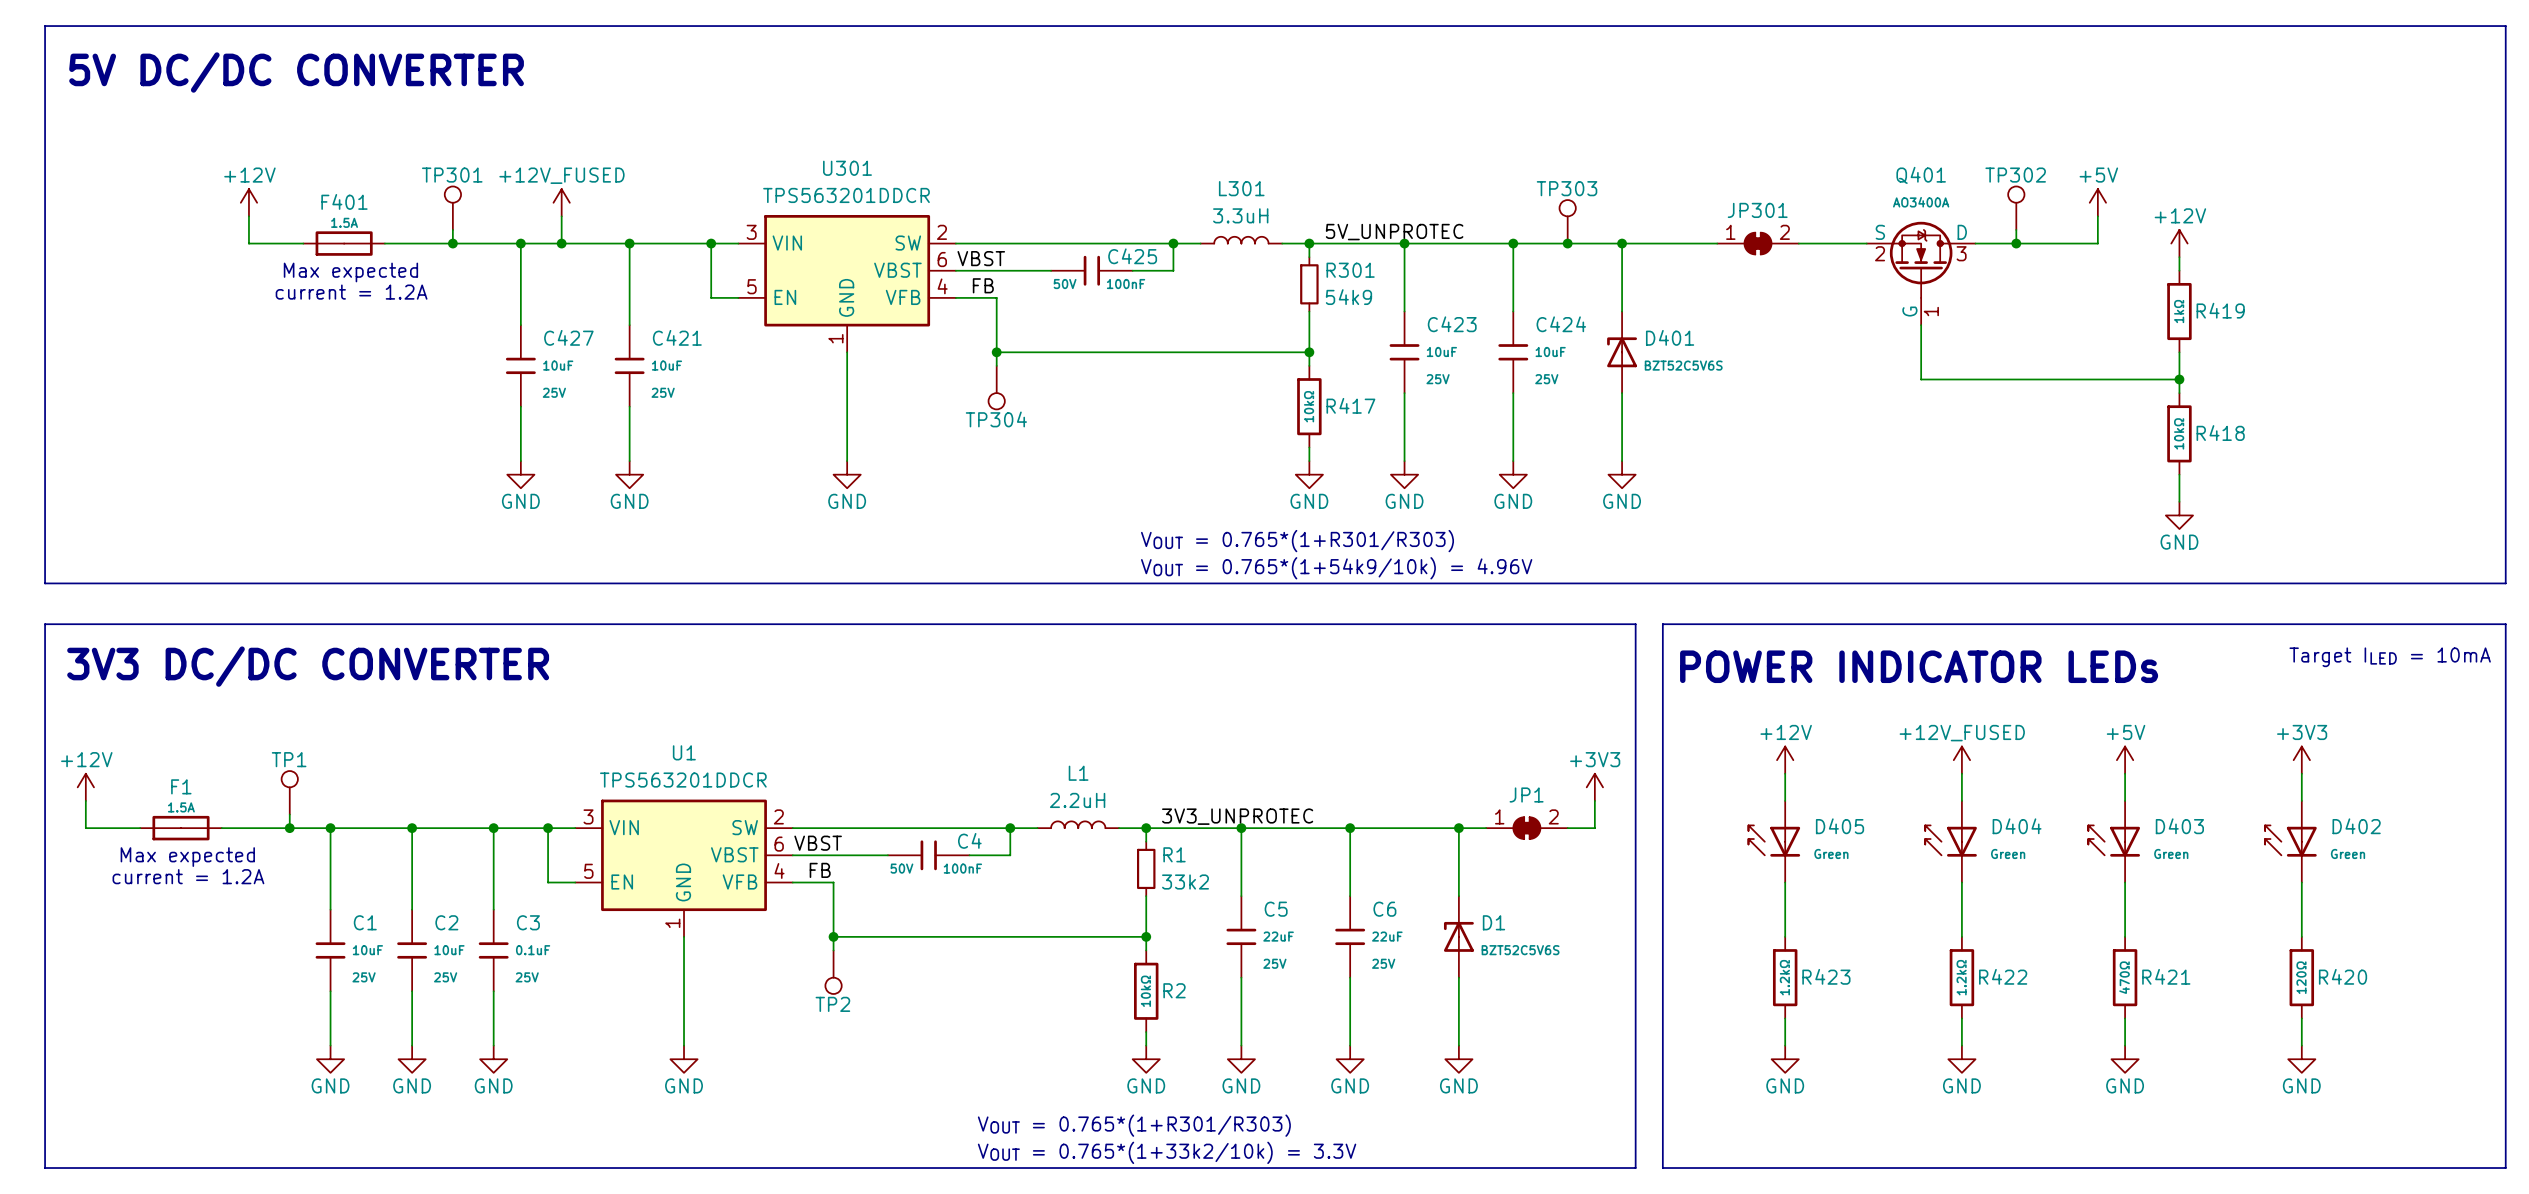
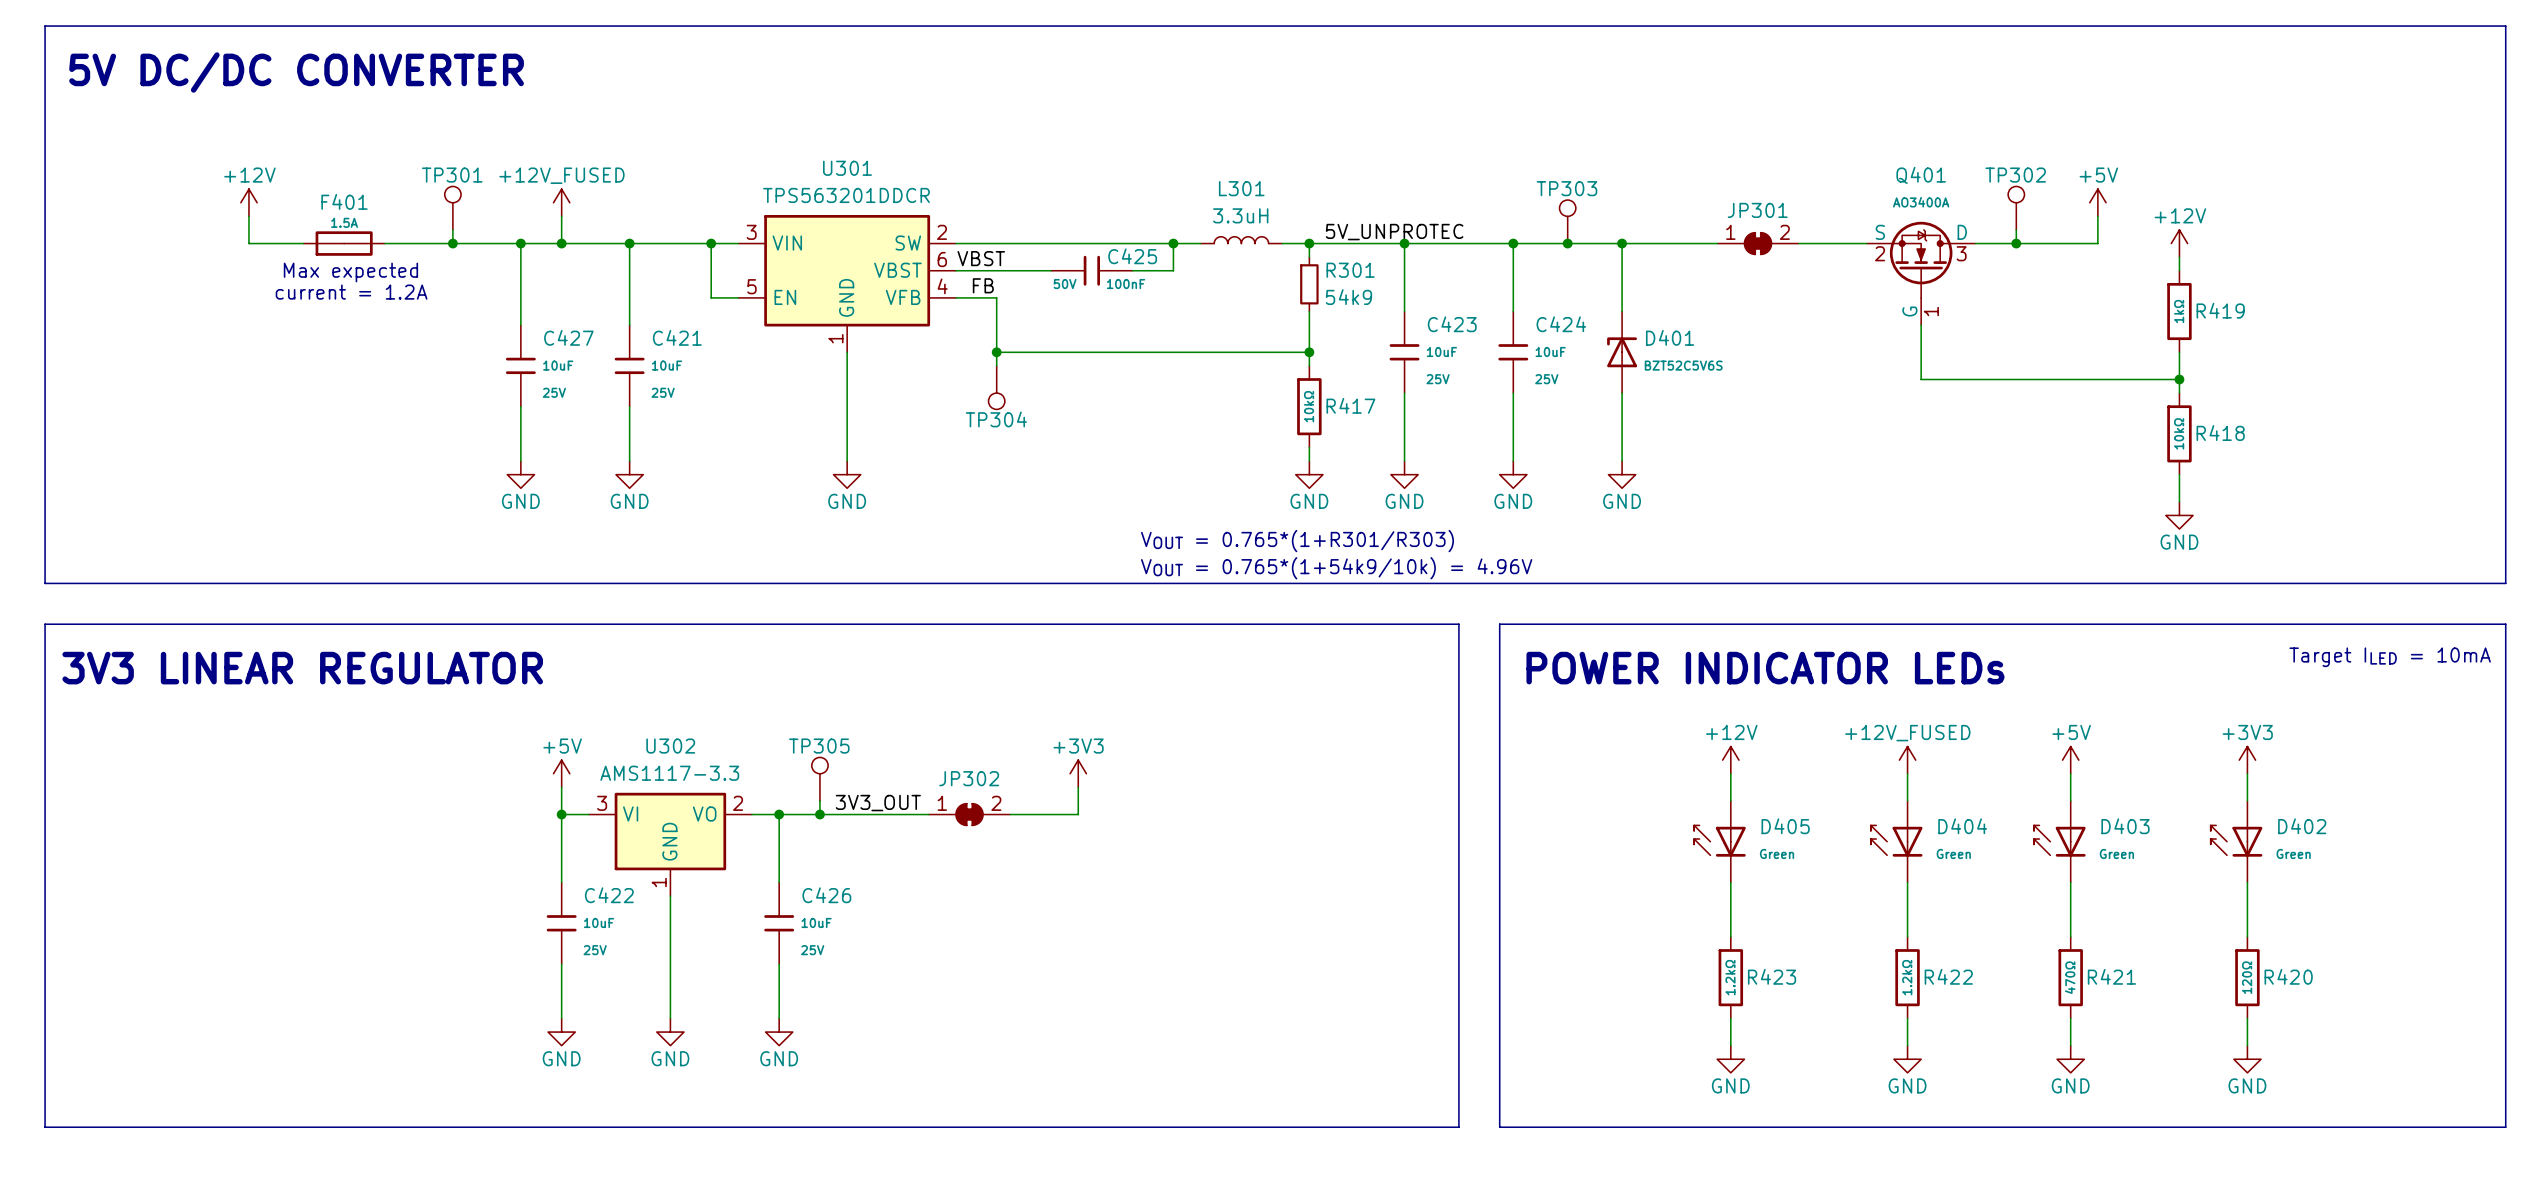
line: (1458, 624) (1499, 624) -> none
line: (1635, 624) (1635, 1168) (45, 1168) (45, 1127) -> (1458, 624) (1458, 1127) (45, 1127)
line: none -> (1635, 624) (1662, 624)
line: (1662, 624) (1662, 1168) (2505, 1168) (2505, 1127) -> (1499, 624) (1499, 1127) (2505, 1127)
text: 3V3 DC/DC CONVERTER (308, 666) -> 3V3 LINEAR REGULATOR (302, 668)
text position: POWER INDICATOR LEDs (1919, 666) -> POWER INDICATOR LEDs (1765, 668)
power symbol position: +12V (1785, 760) -> +12V (1730, 760)
power symbol position: +12V_FUSED (1961, 760) -> +12V_FUSED (1907, 760)
power symbol position: +5V (2125, 760) -> +5V (2070, 760)
power symbol position: +3V3 (2301, 760) -> +3V3 (2247, 760)
power symbol: none -> +5V (561, 773)
power symbol: none -> +3V3 (1078, 773)
wire: (1785, 773) (1785, 800) -> (1730, 773) (1730, 800)
wire: (1961, 773) (1961, 800) -> (1907, 773) (1907, 800)
wire: (2125, 773) (2125, 800) -> (2070, 773) (2070, 800)
wire: (2301, 773) (2301, 800) -> (2247, 773) (2247, 800)
TP305: none -> (819, 779)
power symbol: +12V (85, 787) -> none
wire: none -> (561, 787) (561, 882)
wire: none -> (1078, 787) (1078, 814) (1010, 814)
power symbol: +3V3 (1594, 787) -> none
TP1: (289, 792) -> none
wire: (85, 800) (85, 828) (140, 828) -> none
wire: none -> (819, 800) (819, 814)
wire: (1594, 800) (1594, 828) (1567, 828) -> none
label: none -> 3V3_OUT (878, 803)
wire: (289, 814) (289, 828) -> none
wire: none -> (561, 814) (588, 814)
wire: none -> (751, 814) (928, 814)
wire: none -> (779, 814) (779, 882)
junction: none -> (779, 814)
junction: none -> (819, 814)
JP302: none -> (969, 814)
label: 3V3_UNPROTEC (1237, 816) -> none
L1: 2.2uH (1078, 824) -> none
F1: 1.5A (181, 828) -> none
wire: (221, 828) (575, 828) -> none
junction: (289, 828) -> none
wire: (330, 828) (330, 909) -> none
junction: (330, 828) -> none
wire: (412, 828) (412, 909) -> none
junction: (412, 828) -> none
wire: (493, 828) (493, 909) -> none
junction: (493, 828) -> none
wire: (548, 828) (548, 882) (575, 882) -> none
junction position: (548, 828) -> (561, 814)
wire: (792, 828) (1037, 828) -> none
wire: (1010, 828) (1010, 855) (969, 855) -> none
junction: (1010, 828) -> none
wire: (1119, 828) (1486, 828) -> none
wire: (1146, 828) (1146, 841) -> none
junction: (1146, 828) -> none
wire: (1241, 828) (1241, 896) -> none
junction: (1241, 828) -> none
wire: (1350, 828) (1350, 896) -> none
junction: (1350, 828) -> none
junction: (1458, 828) -> none
JP1: (1526, 828) -> none
D405 position: (1773, 841) -> (1719, 841)
D404 position: (1950, 841) -> (1896, 841)
D403 position: (2113, 841) -> (2059, 841)
D402 position: (2290, 841) -> (2236, 841)
label: VBST (818, 843) -> none
U302: none -> AMS1117-3.3 (670, 844)
wire: (792, 855) (887, 855) -> none
C4: 100nF (928, 855) -> none
text: Max expected (187, 857) -> none
U1: TPS563201DDCR (684, 868) -> none
R1: 33k2 (1146, 868) -> none
label: FB (820, 870) -> none
text: current = 1.2A (188, 876) -> none
wire: (792, 882) (833, 882) (833, 950) -> none
wire: (1785, 882) (1785, 936) -> (1730, 882) (1730, 936)
wire: (1961, 882) (1961, 936) -> (1907, 882) (1907, 936)
wire: (2125, 882) (2125, 936) -> (2070, 882) (2070, 936)
wire: (2301, 882) (2301, 936) -> (2247, 882) (2247, 936)
wire: none -> (670, 896) (670, 1018)
wire: (1146, 896) (1146, 950) -> none
C422: none -> 10uF (561, 923)
C426: none -> 10uF (779, 923)
wire: (684, 936) (684, 1045) -> none
wire: (833, 936) (1146, 936) -> none
junction: (833, 936) -> none
junction: (1146, 936) -> none
C5: 22uF (1241, 936) -> none
C6: 22uF (1350, 936) -> none
D1: BZT52C5V6S (1458, 936) -> none
C1: 10uF (330, 950) -> none
C2: 10uF (412, 950) -> none
C3: 0.1uF (493, 950) -> none
wire: none -> (779, 964) (779, 1018)
TP2: (833, 972) -> none
wire: (1241, 977) (1241, 1045) -> none
wire: (1350, 977) (1350, 1045) -> none
R423 position: (1785, 977) -> (1730, 977)
R422 position: (1961, 977) -> (1907, 977)
R421 position: (2125, 977) -> (2070, 977)
R420 position: (2301, 977) -> (2247, 977)
wire: (330, 991) (330, 1045) -> none
wire: (412, 991) (412, 1045) -> none
wire: (493, 991) (493, 1045) -> (561, 964) (561, 1018)
R2: 10kΩ (1146, 991) -> none
wire: (1785, 1018) (1785, 1045) -> (1730, 1018) (1730, 1045)
wire: (1961, 1018) (1961, 1045) -> (1907, 1018) (1907, 1045)
wire: (2125, 1018) (2125, 1045) -> (2070, 1018) (2070, 1045)
wire: (2301, 1018) (2301, 1045) -> (2247, 1018) (2247, 1045)
power symbol: none -> GND (561, 1032)
power symbol: none -> GND (779, 1032)
wire: (1146, 1032) (1146, 1045) -> none
power symbol: GND (330, 1059) -> none
power symbol: GND (412, 1059) -> none
power symbol: GND (493, 1059) -> none
power symbol position: GND (684, 1059) -> GND (670, 1032)
power symbol: GND (1146, 1059) -> none
power symbol: GND (1241, 1059) -> none
power symbol: GND (1350, 1059) -> none
power symbol: GND (1458, 1059) -> none
power symbol position: GND (1785, 1059) -> GND (1730, 1059)
power symbol: none -> GND (1907, 1059)
power symbol: GND (1961, 1059) -> none
power symbol: none -> GND (2070, 1059)
power symbol: GND (2125, 1059) -> none
power symbol position: GND (2301, 1059) -> GND (2247, 1059)
text: VOUT = 0.765*(1+R301/R303) (1134, 1125) -> none
text: VOUT = 0.765*(1+33k2/10k) = 3.3V (1167, 1152) -> none

